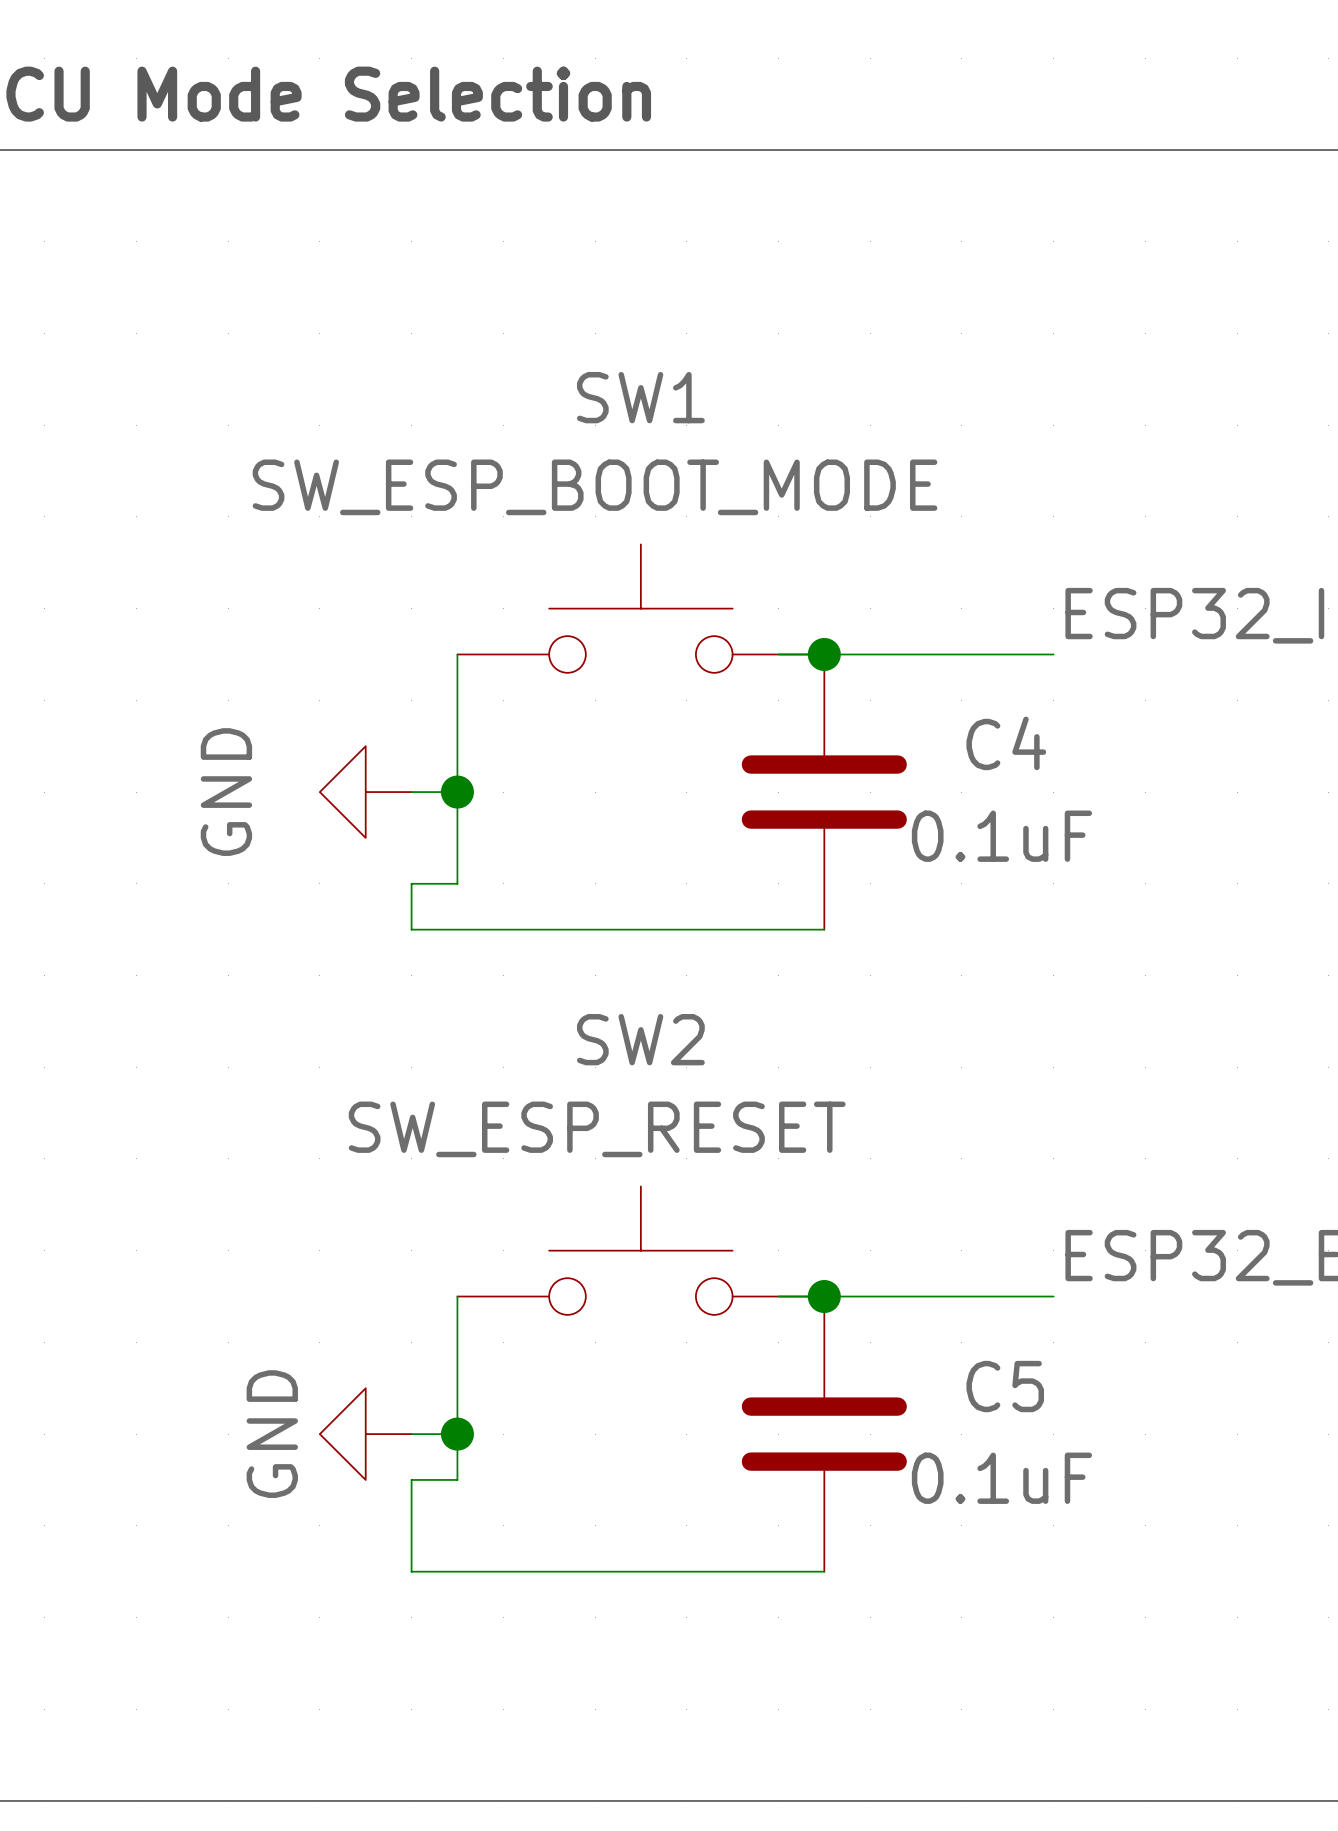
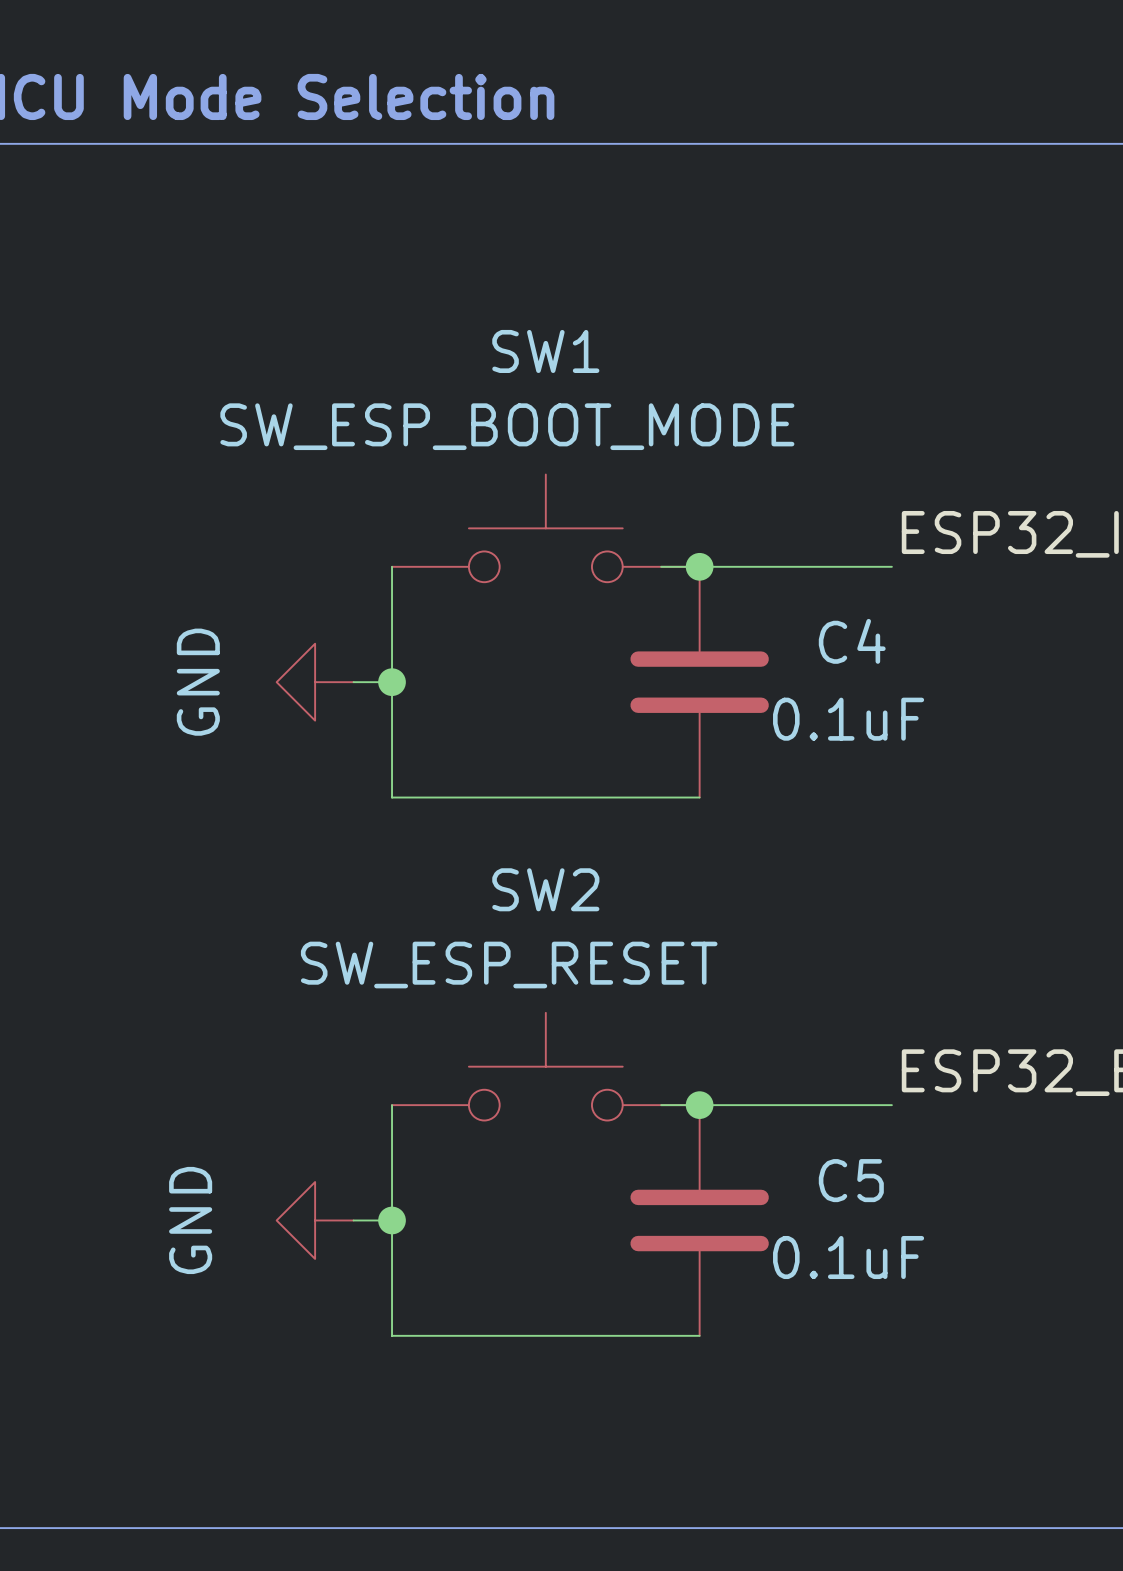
wire: (457, 883) (411, 883) (411, 929) (457, 929) -> (392, 759) (392, 797)
power symbol text position: GND (272, 1434) -> GND (190, 1220)
wire: (457, 1479) (411, 1479) (411, 1571) (457, 1571) -> (392, 1258) (392, 1335)

